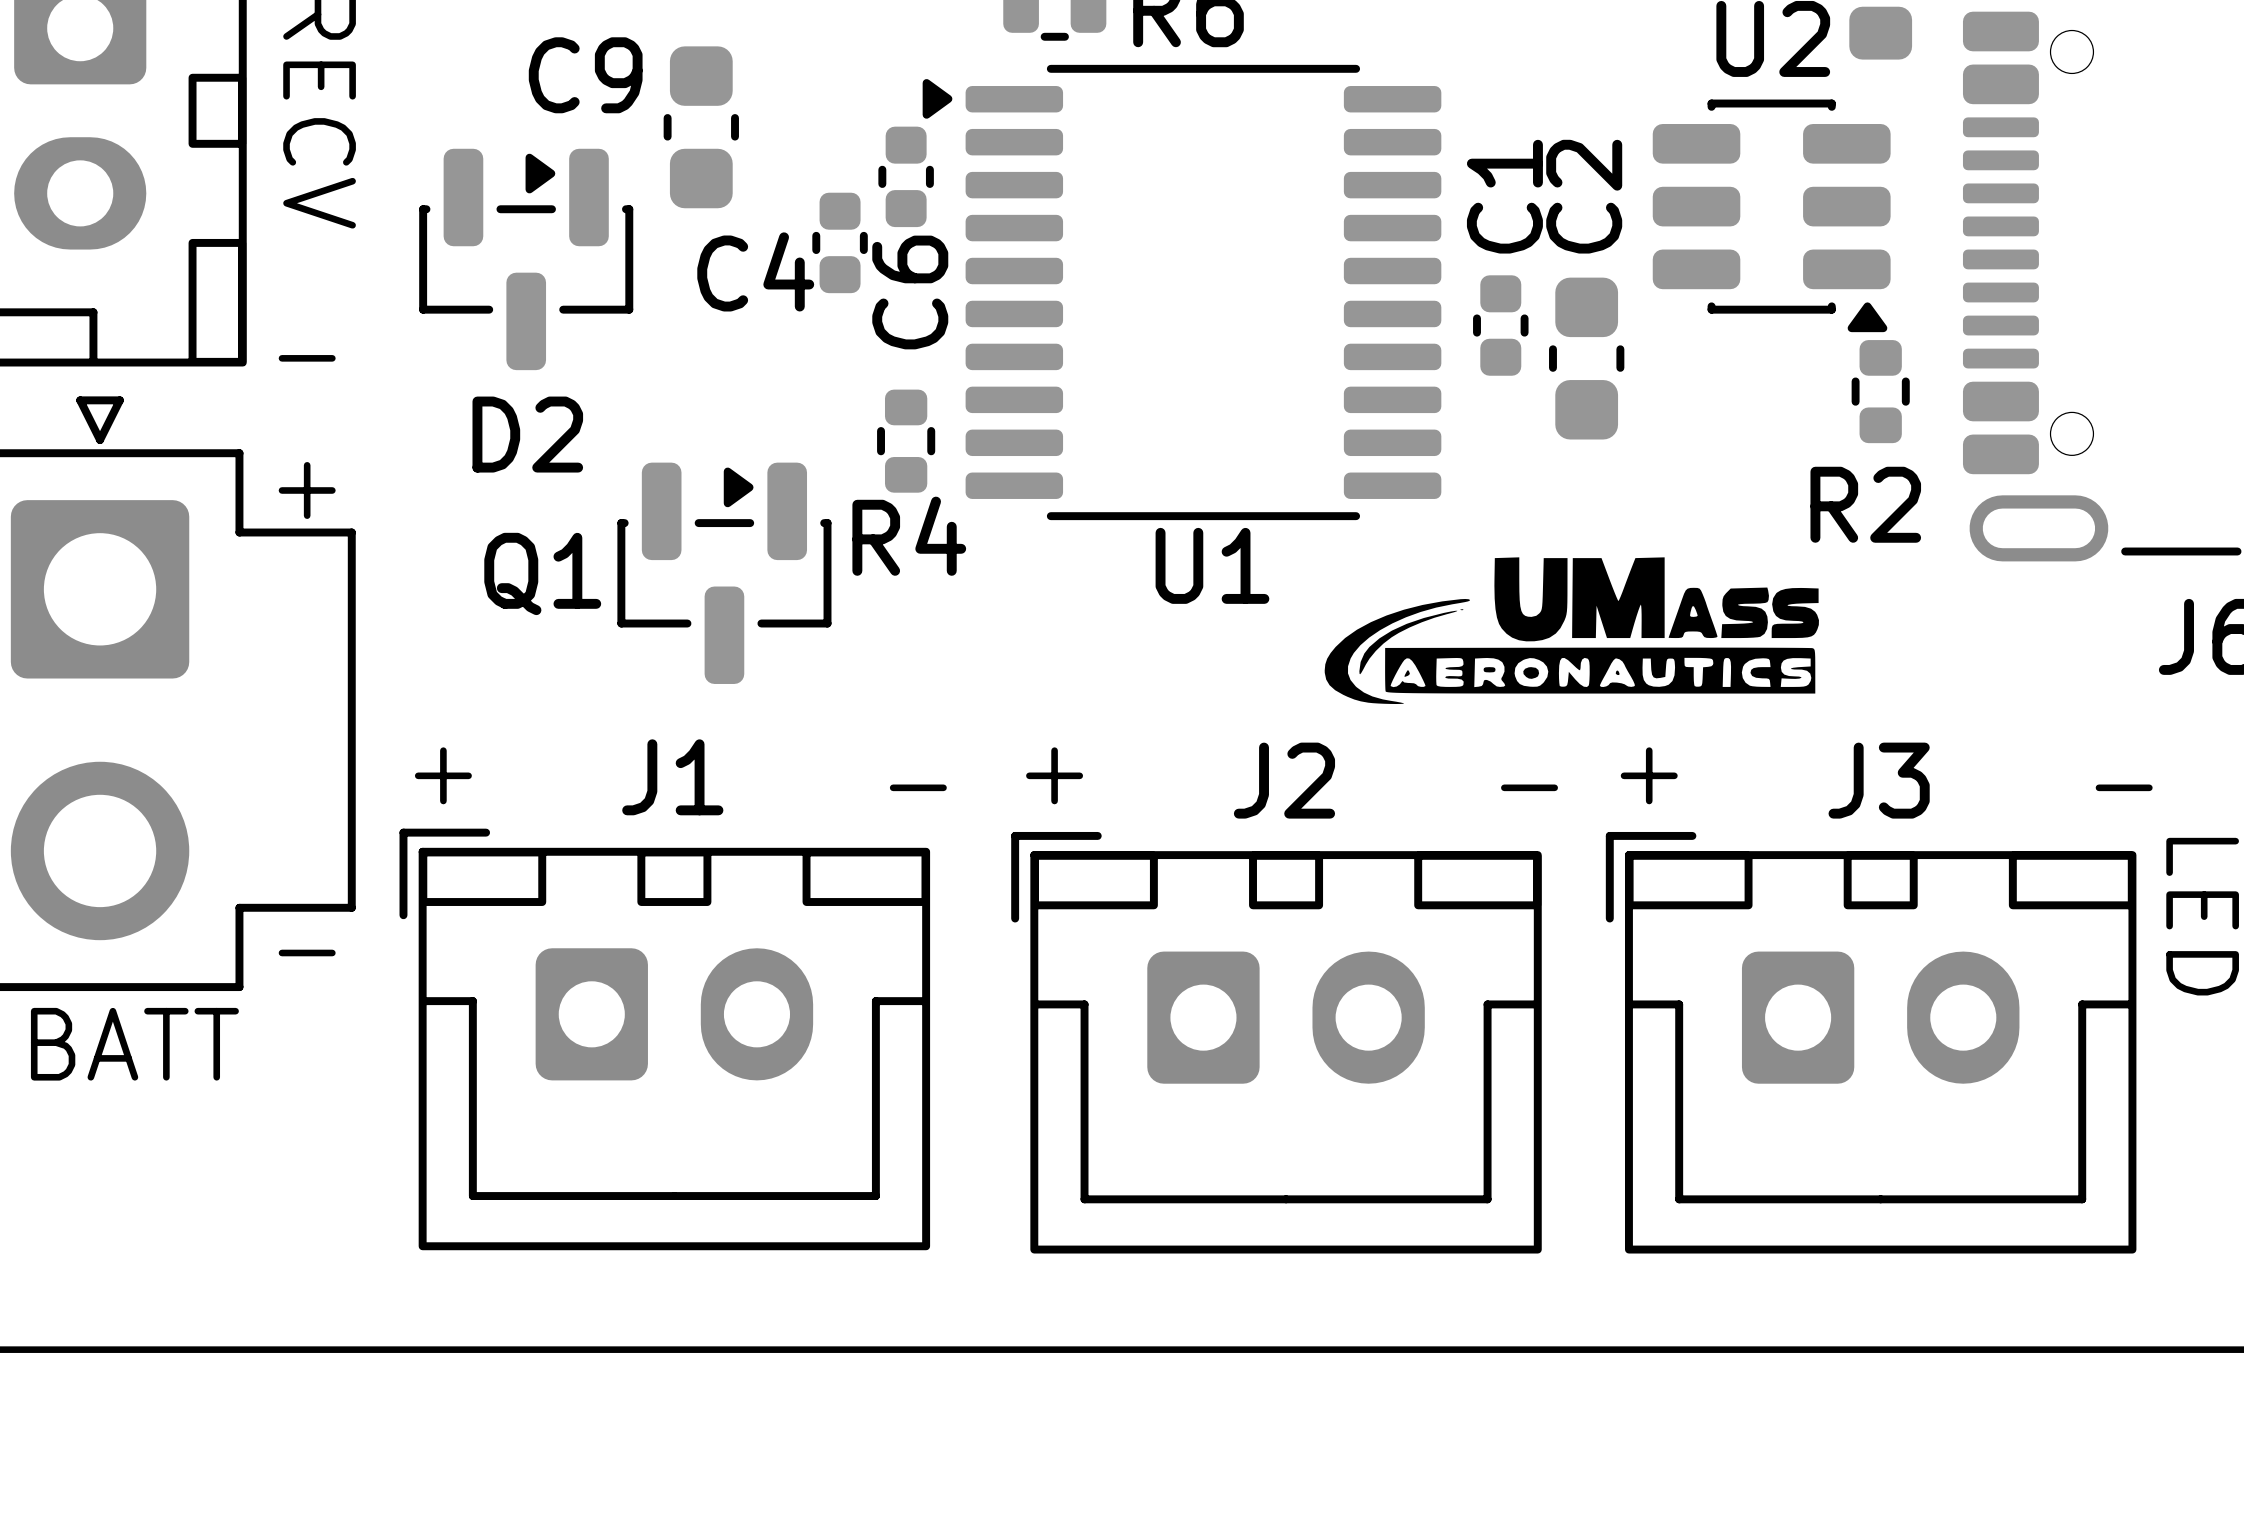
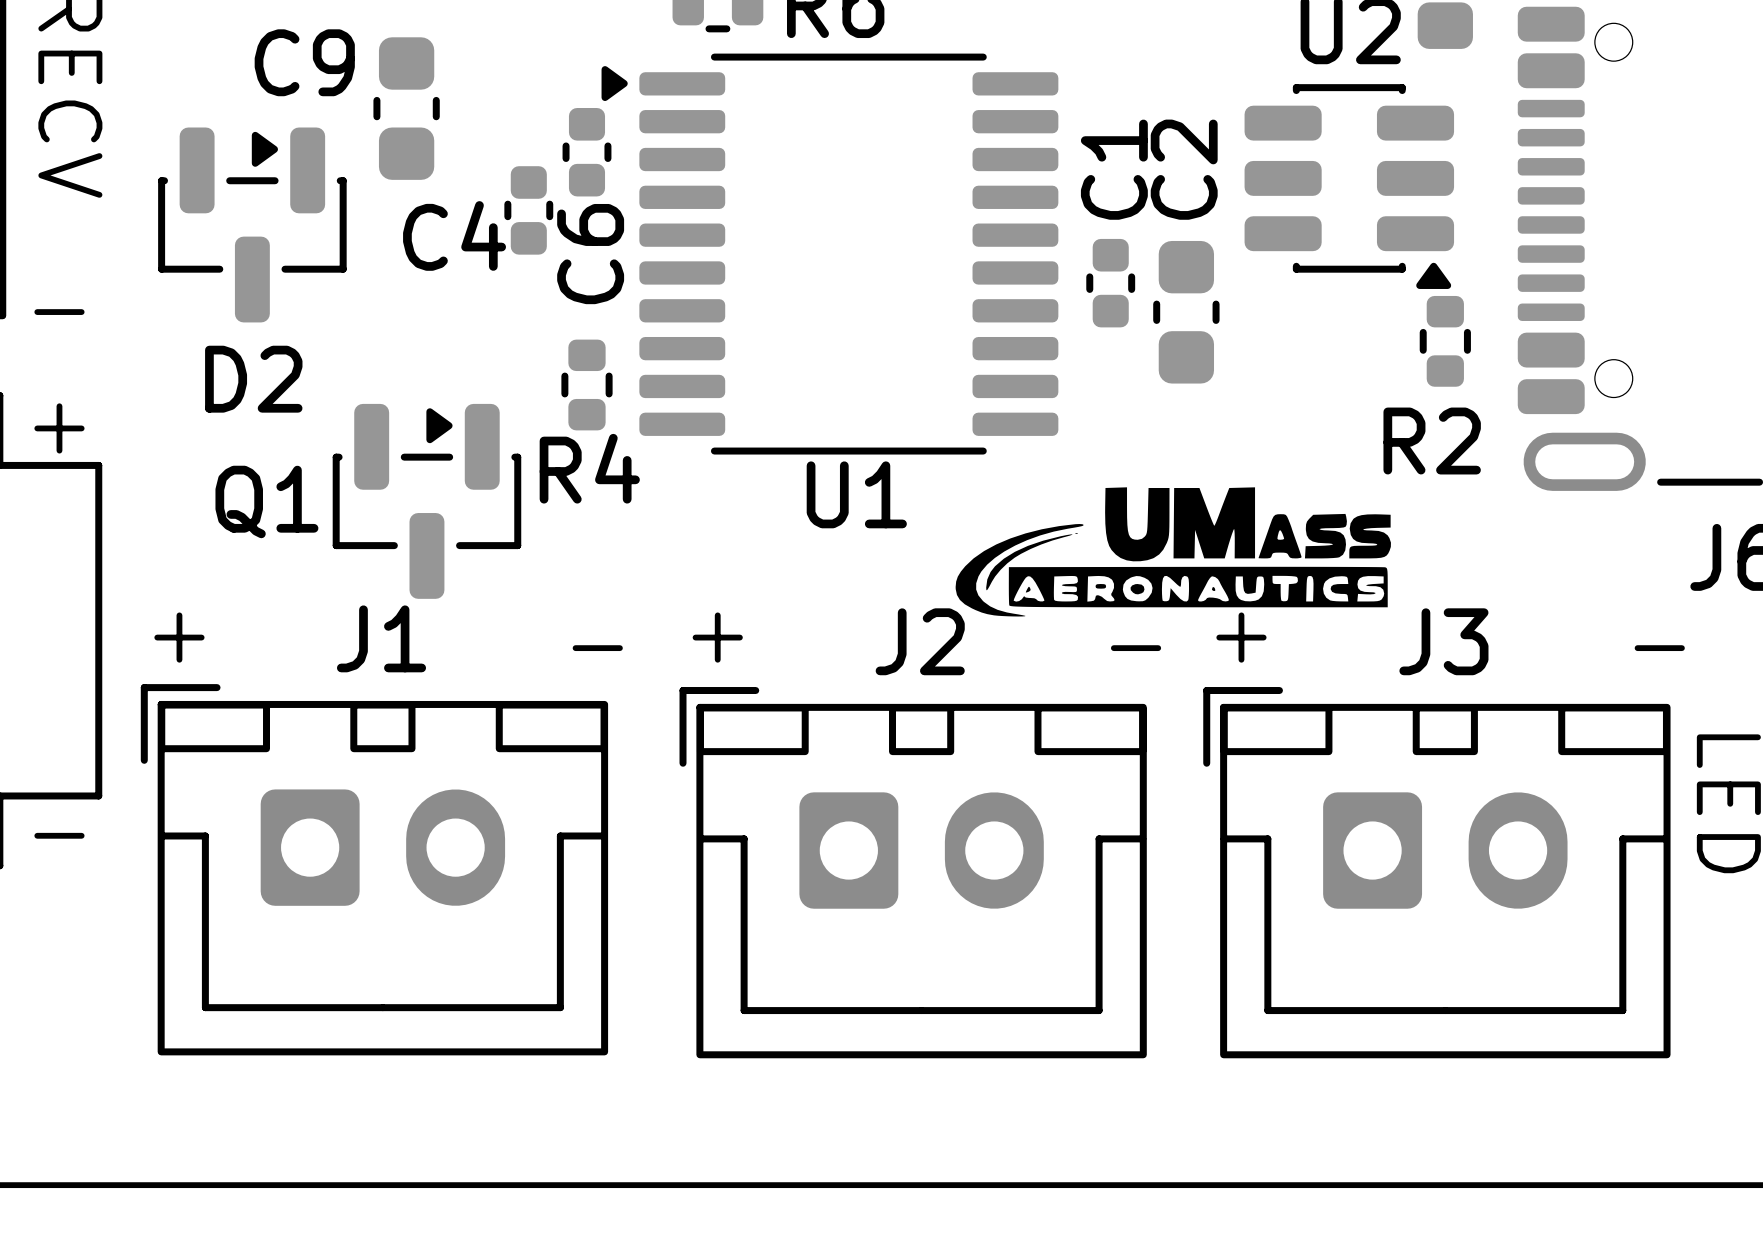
text position: + (443, 775) -> + (179, 637)
text position: + (1054, 775) -> + (717, 637)
text position: + (1649, 775) -> + (1241, 637)
text position: - (918, 787) -> - (597, 648)
text position: - (1529, 787) -> - (1136, 648)
text position: - (2124, 787) -> - (1659, 648)
J1 position: (664, 1039) -> (374, 869)
J2 position: (1276, 1042) -> (913, 872)
J3 position: (1871, 1042) -> (1436, 872)

